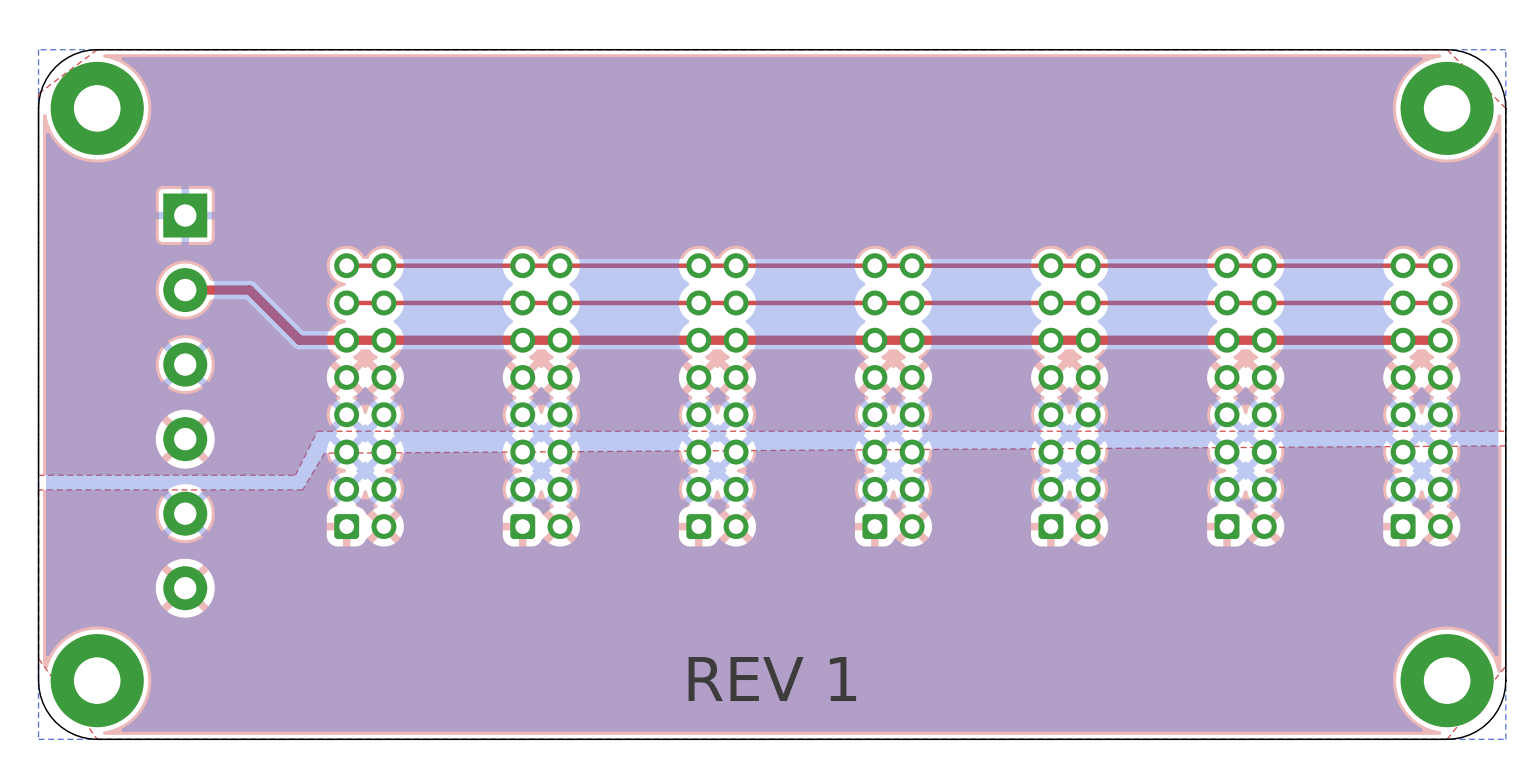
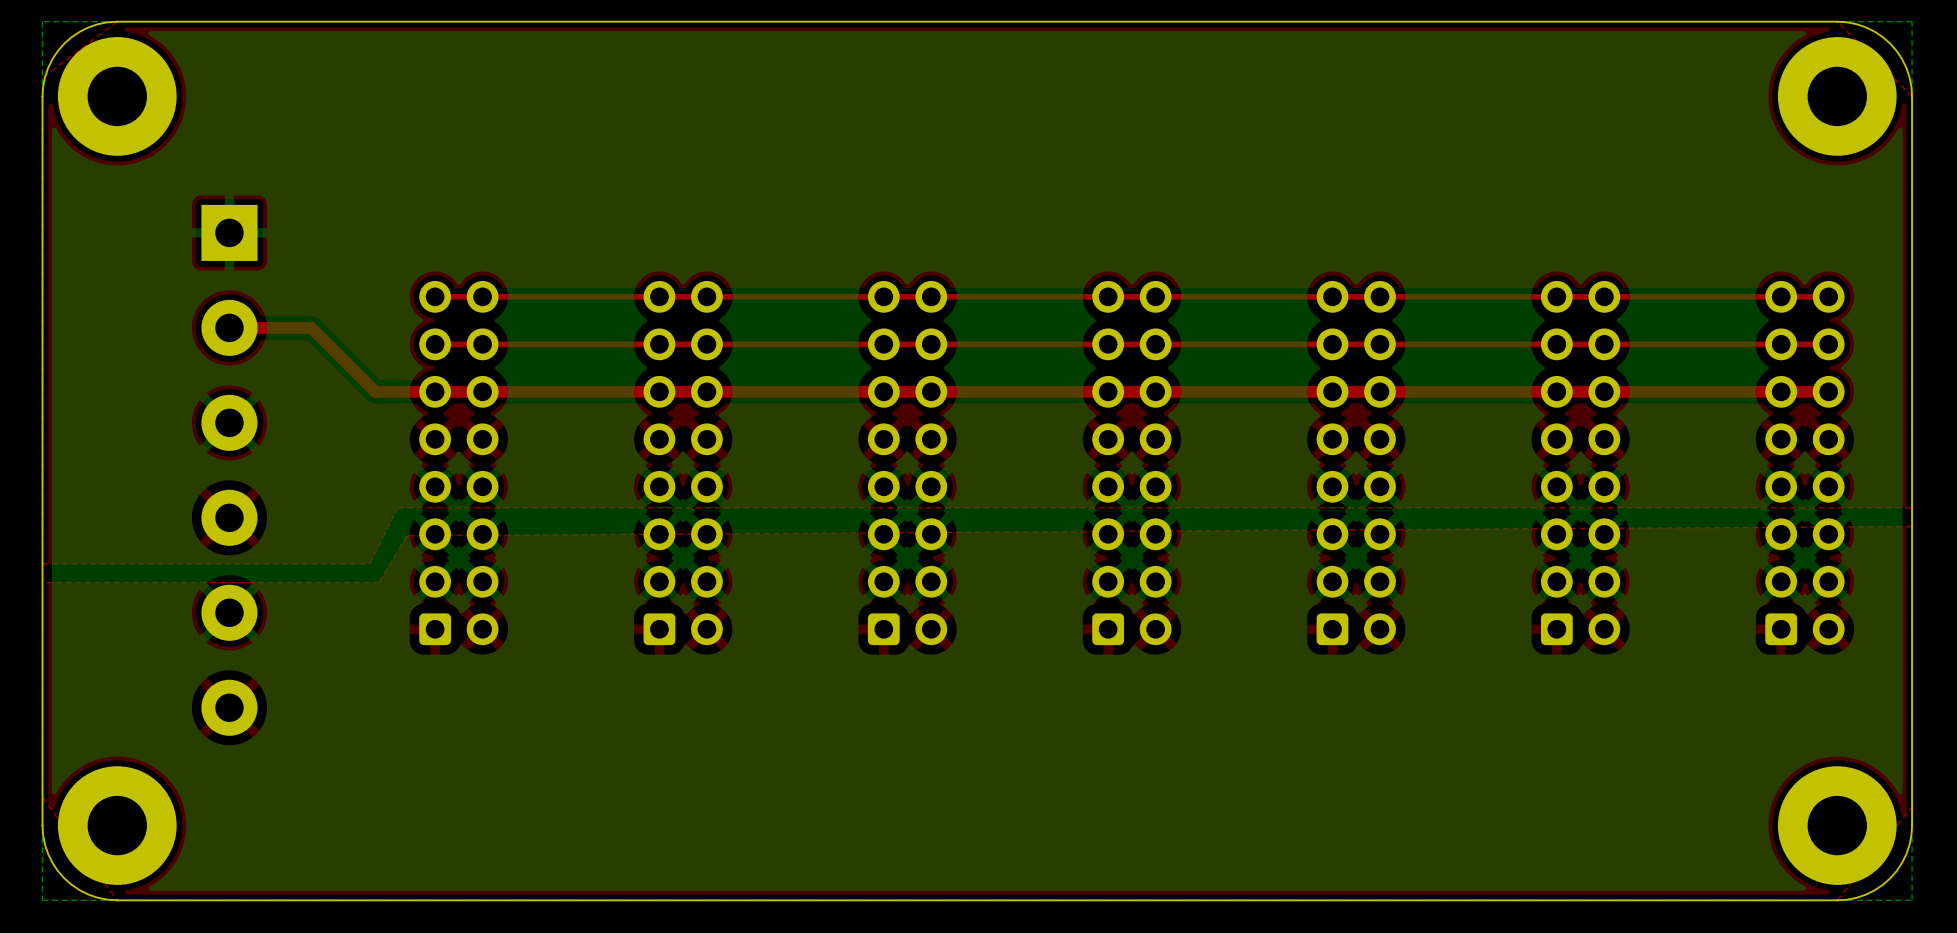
text: REV 1 (772, 679) -> none

